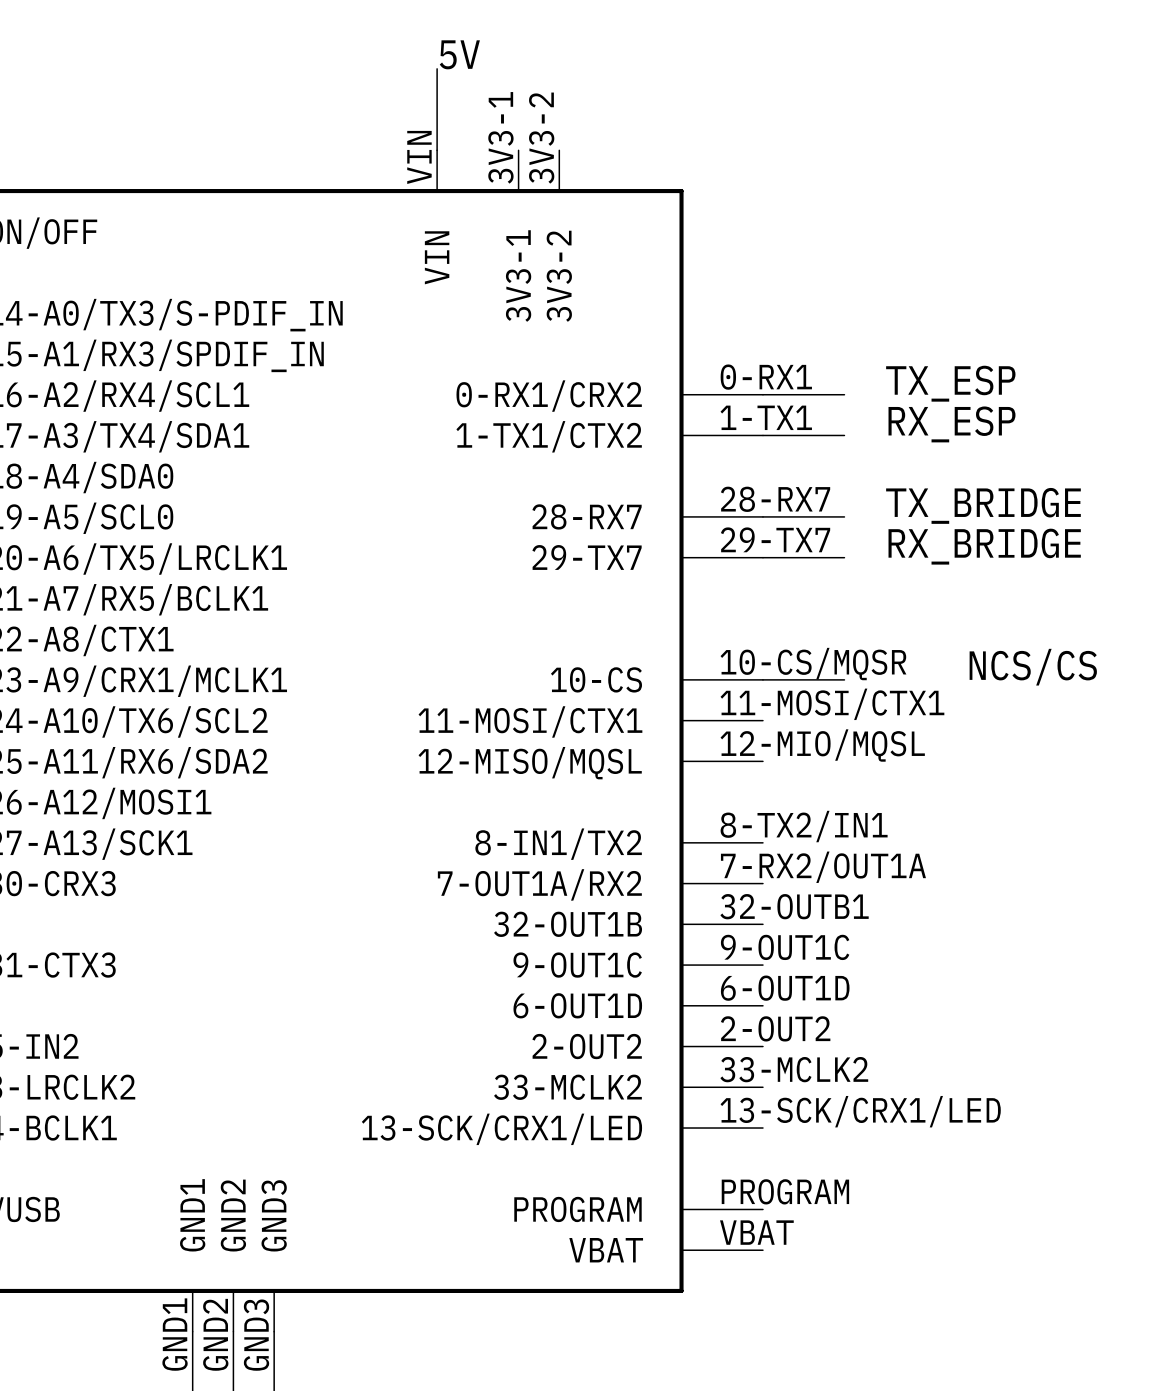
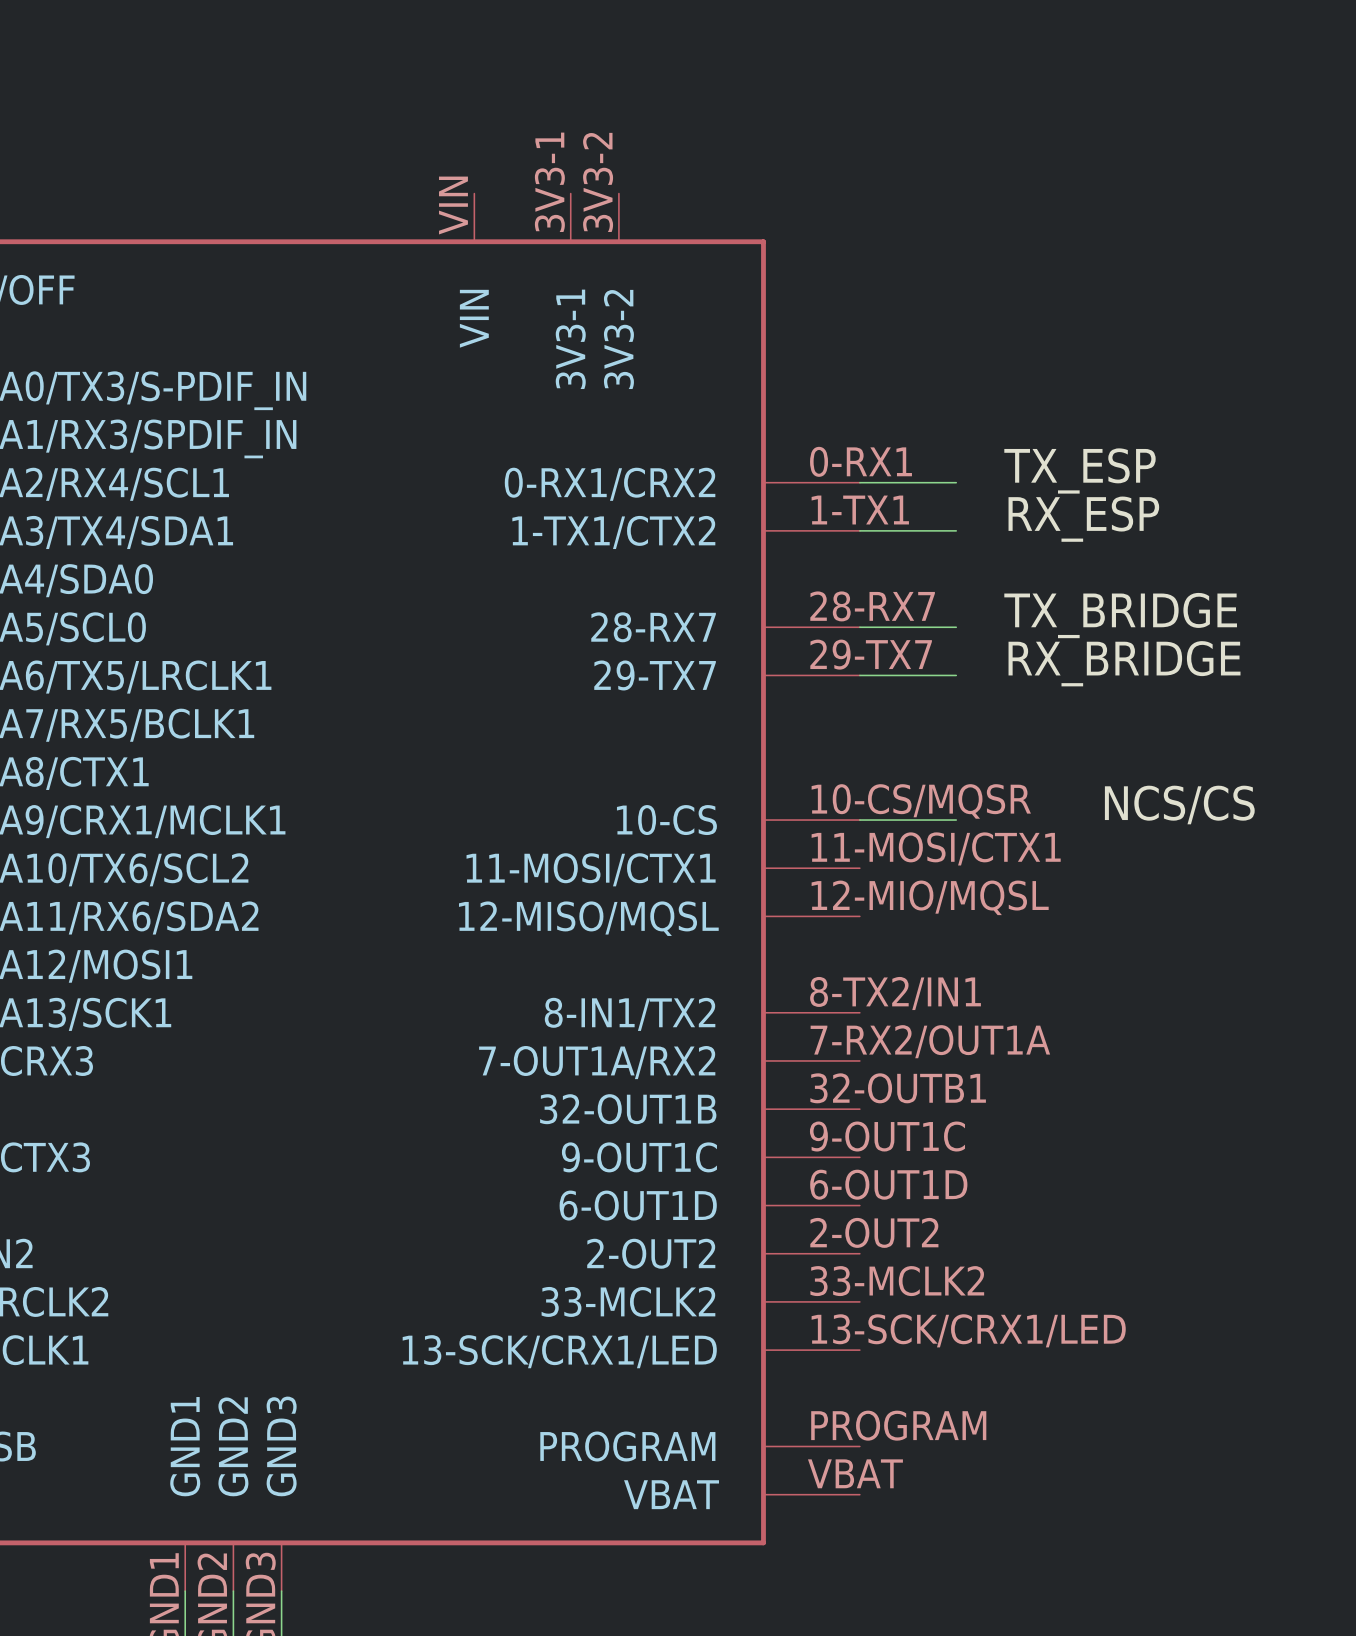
label: 5V (459, 54) -> none
wire: (437, 68) (437, 150) -> none

